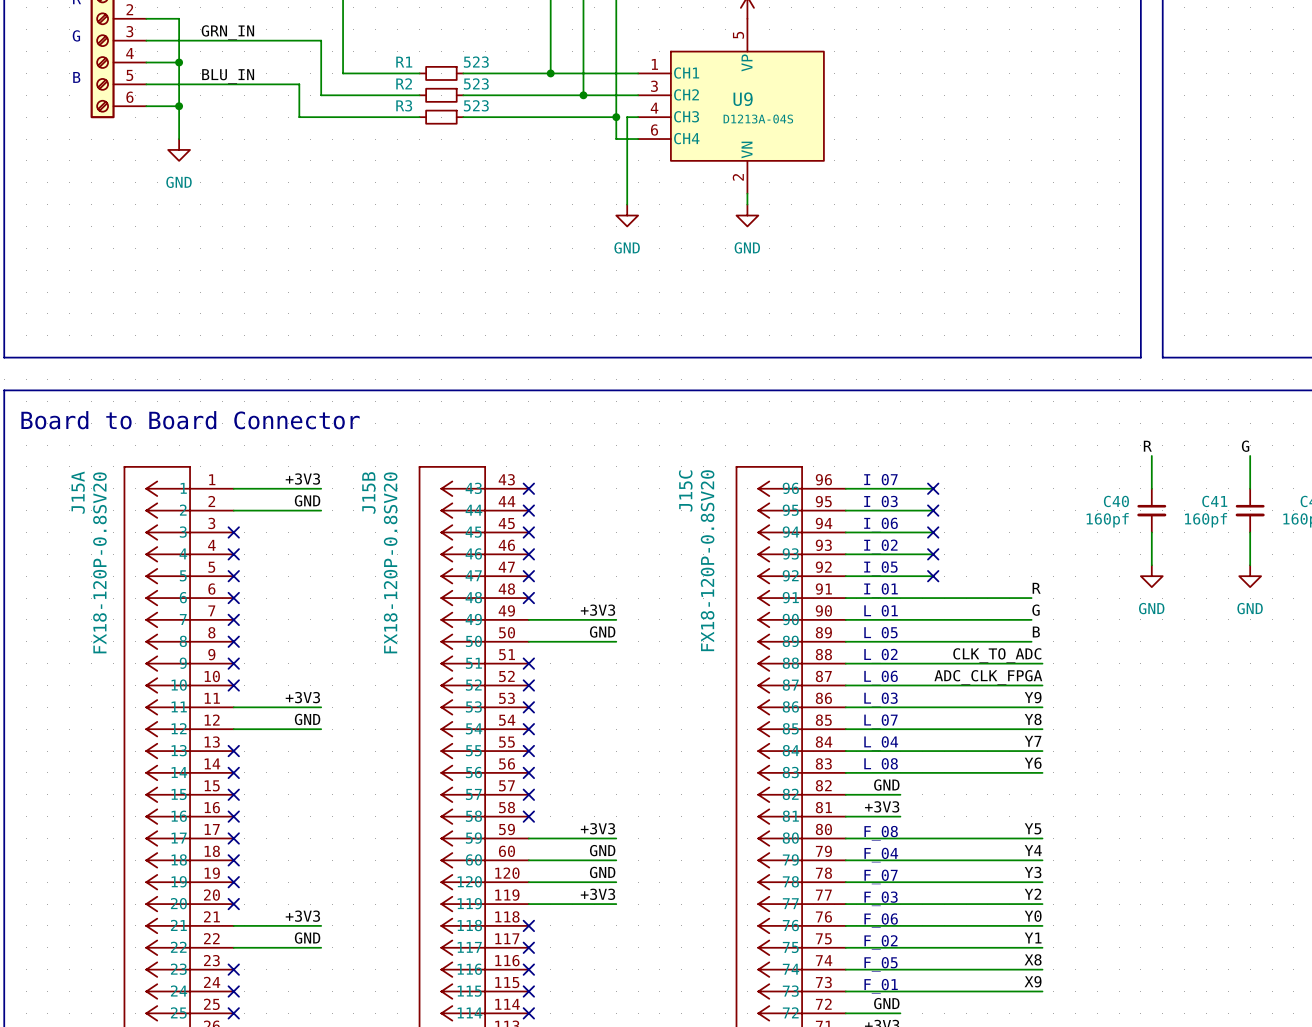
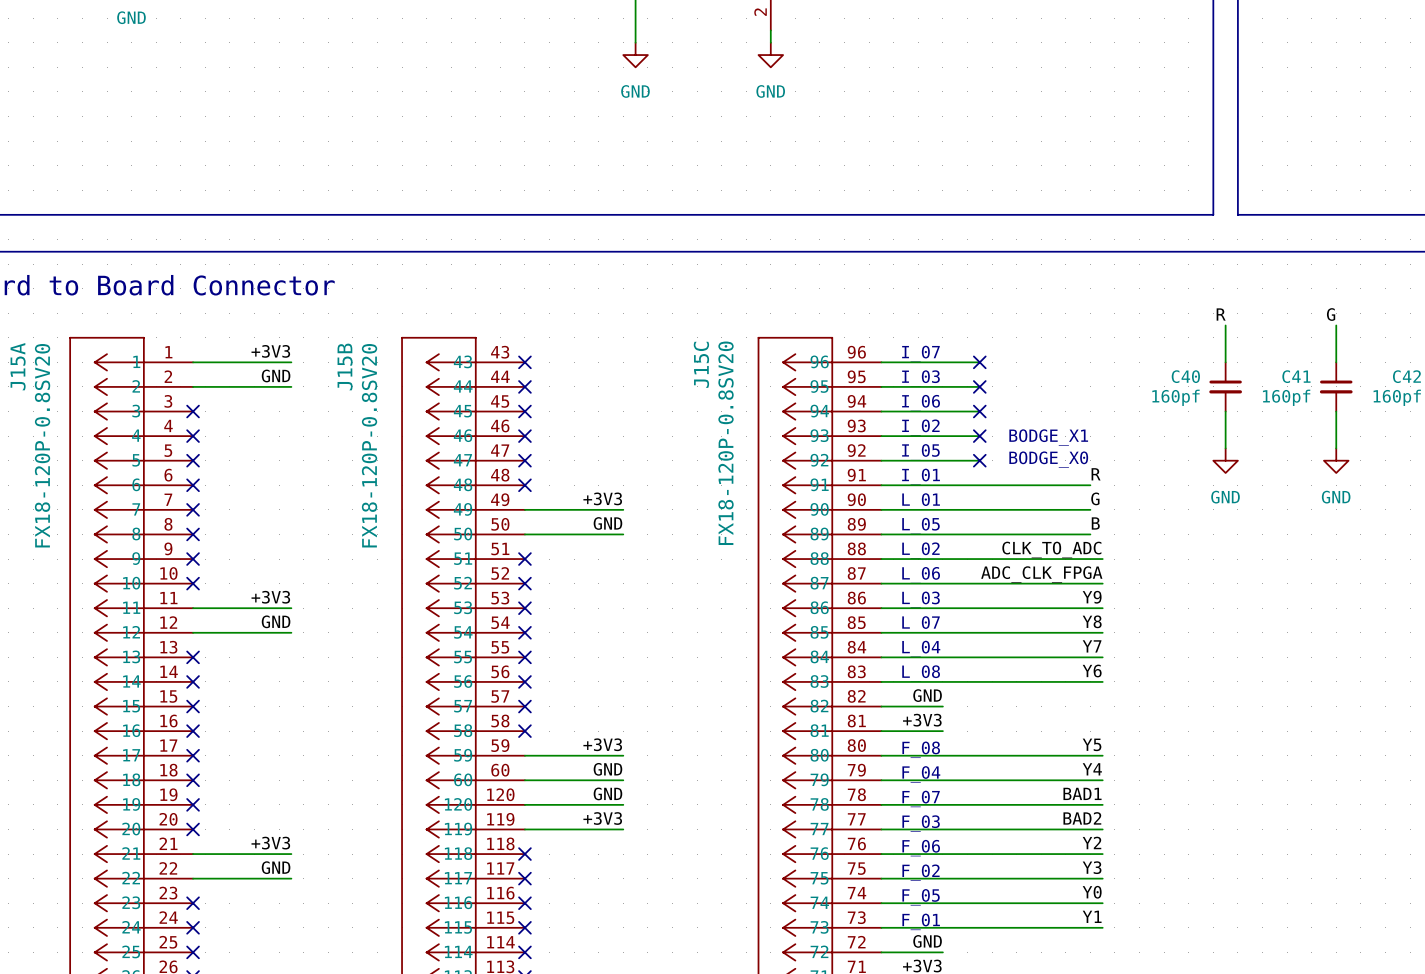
text: none -> BODGE_X1 (1048, 437)
text: none -> BODGE_X0 (1048, 459)
label: Y3 (1033, 872) -> BAD1 (1082, 793)
label: Y2 (1032, 894) -> BAD2 (1082, 818)
label: Y0 (1033, 916) -> Y2 (1091, 842)
label: Y1 (1033, 938) -> Y3 (1092, 867)
label: X8 (1033, 959) -> Y0 (1092, 892)
label: X9 (1033, 981) -> Y1 (1092, 916)

